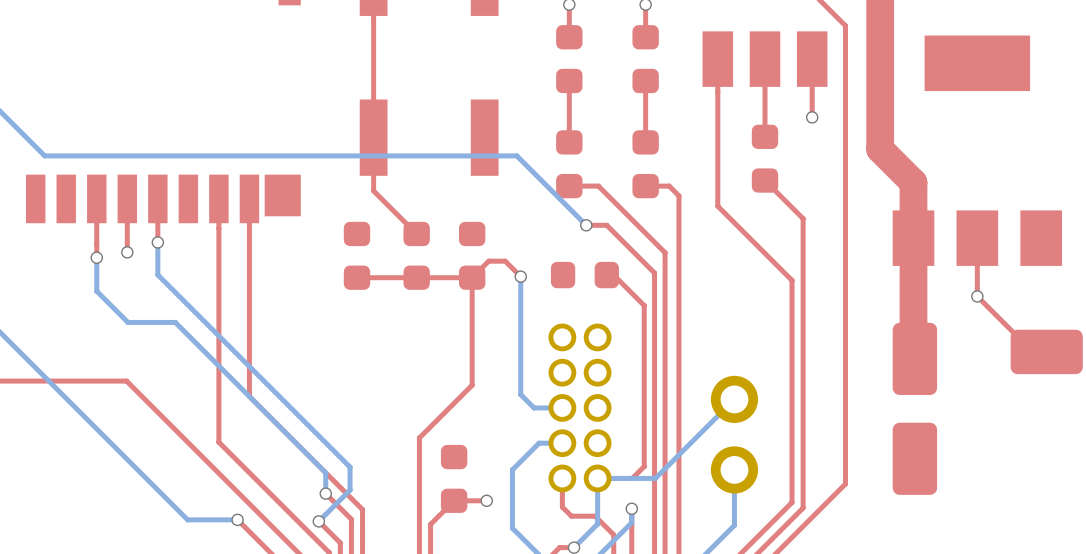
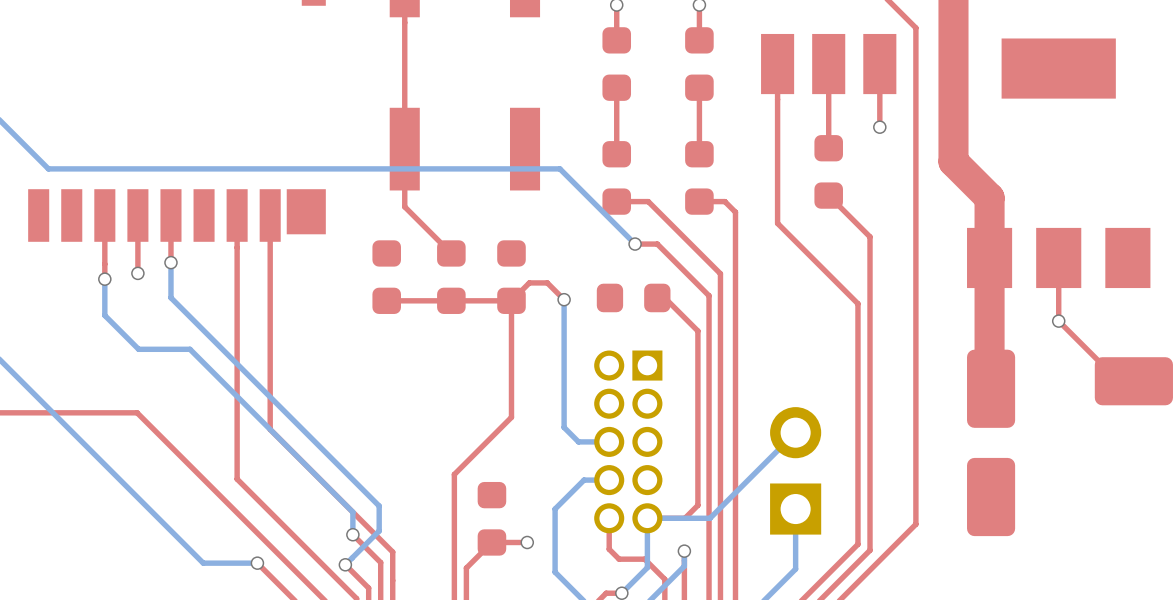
part footprint: [548, 323, 612, 493] -> [594, 350, 663, 534]
part footprint: [710, 375, 759, 494] -> [770, 407, 822, 535]

